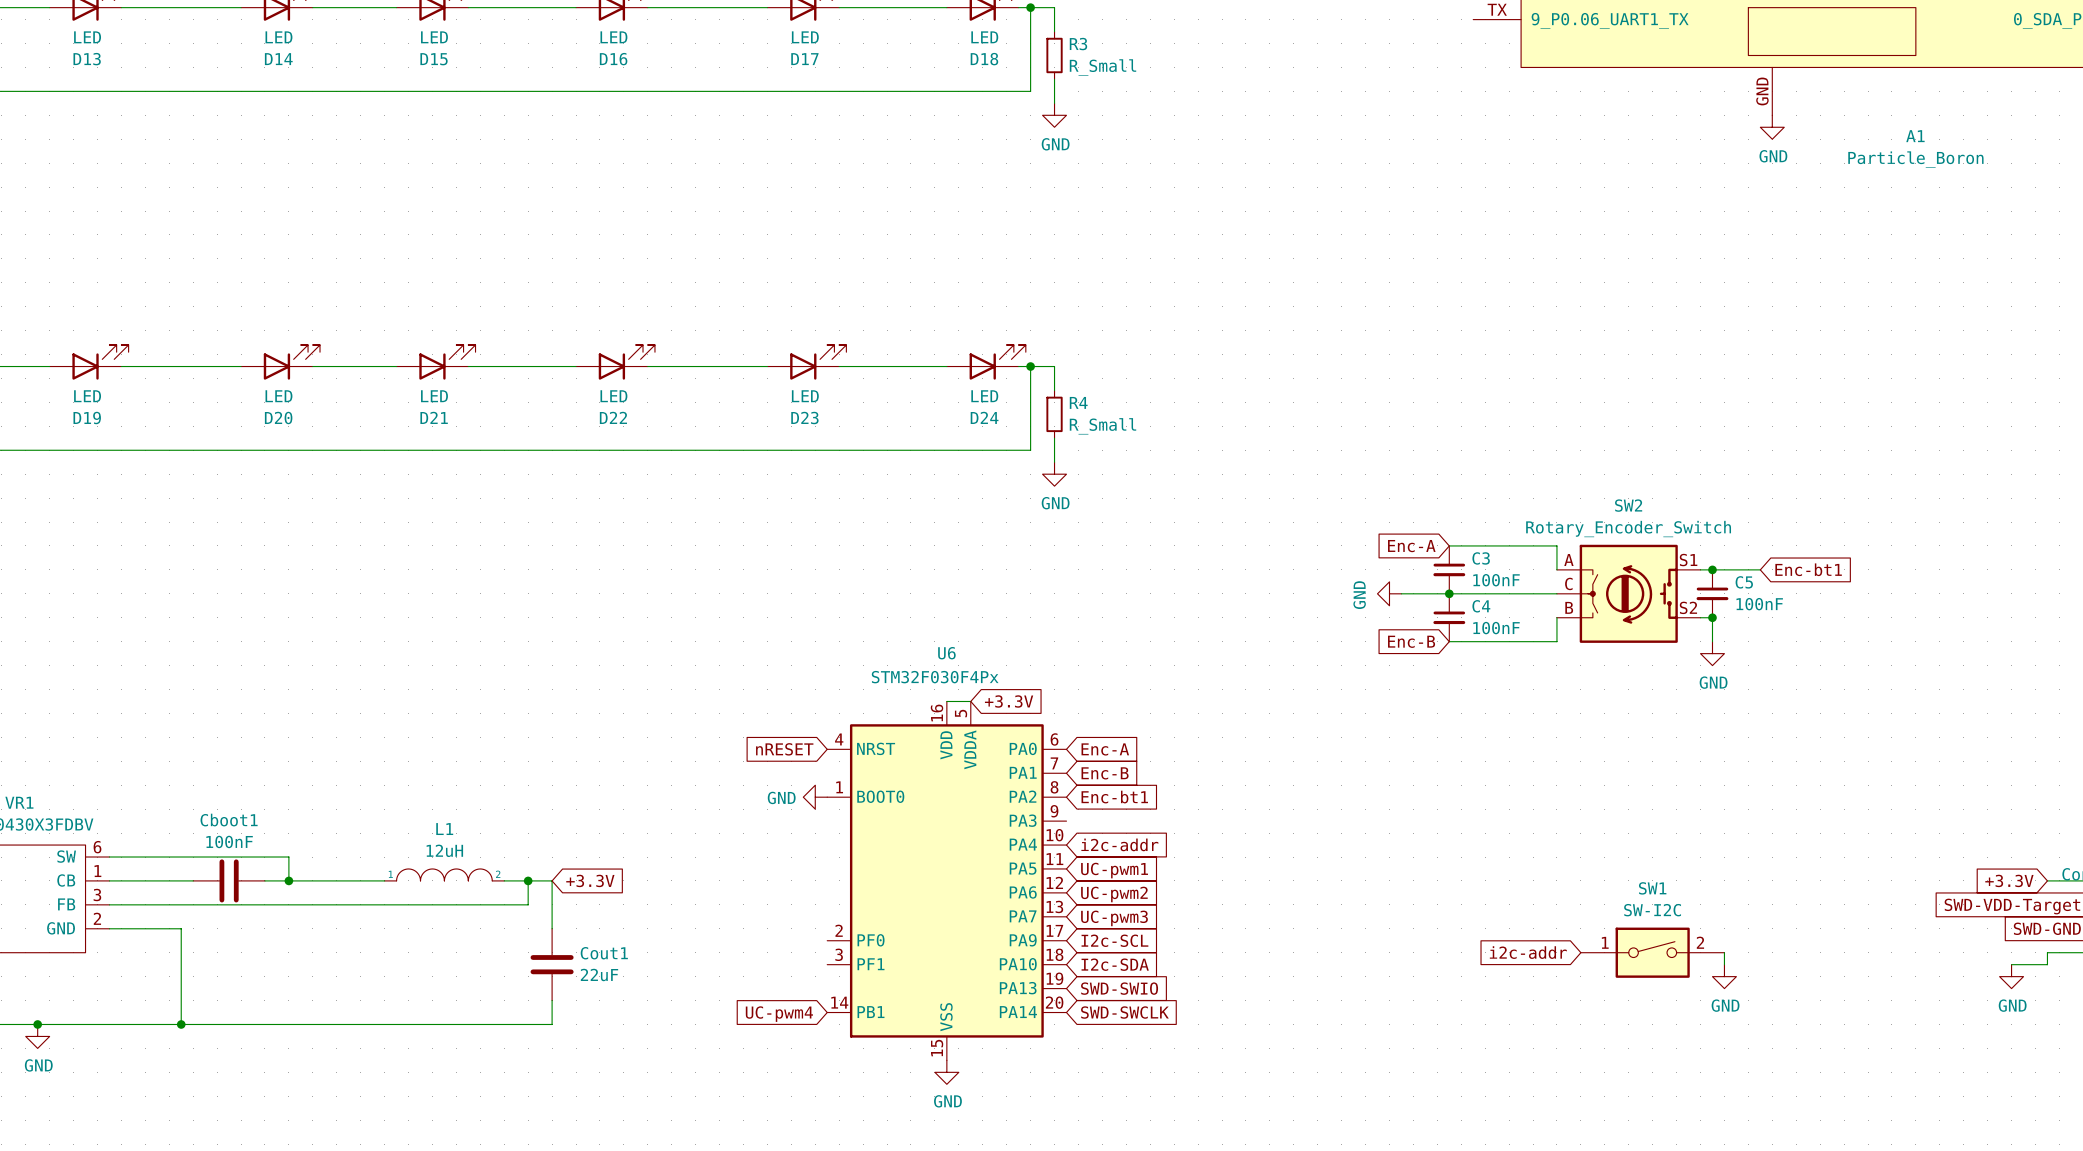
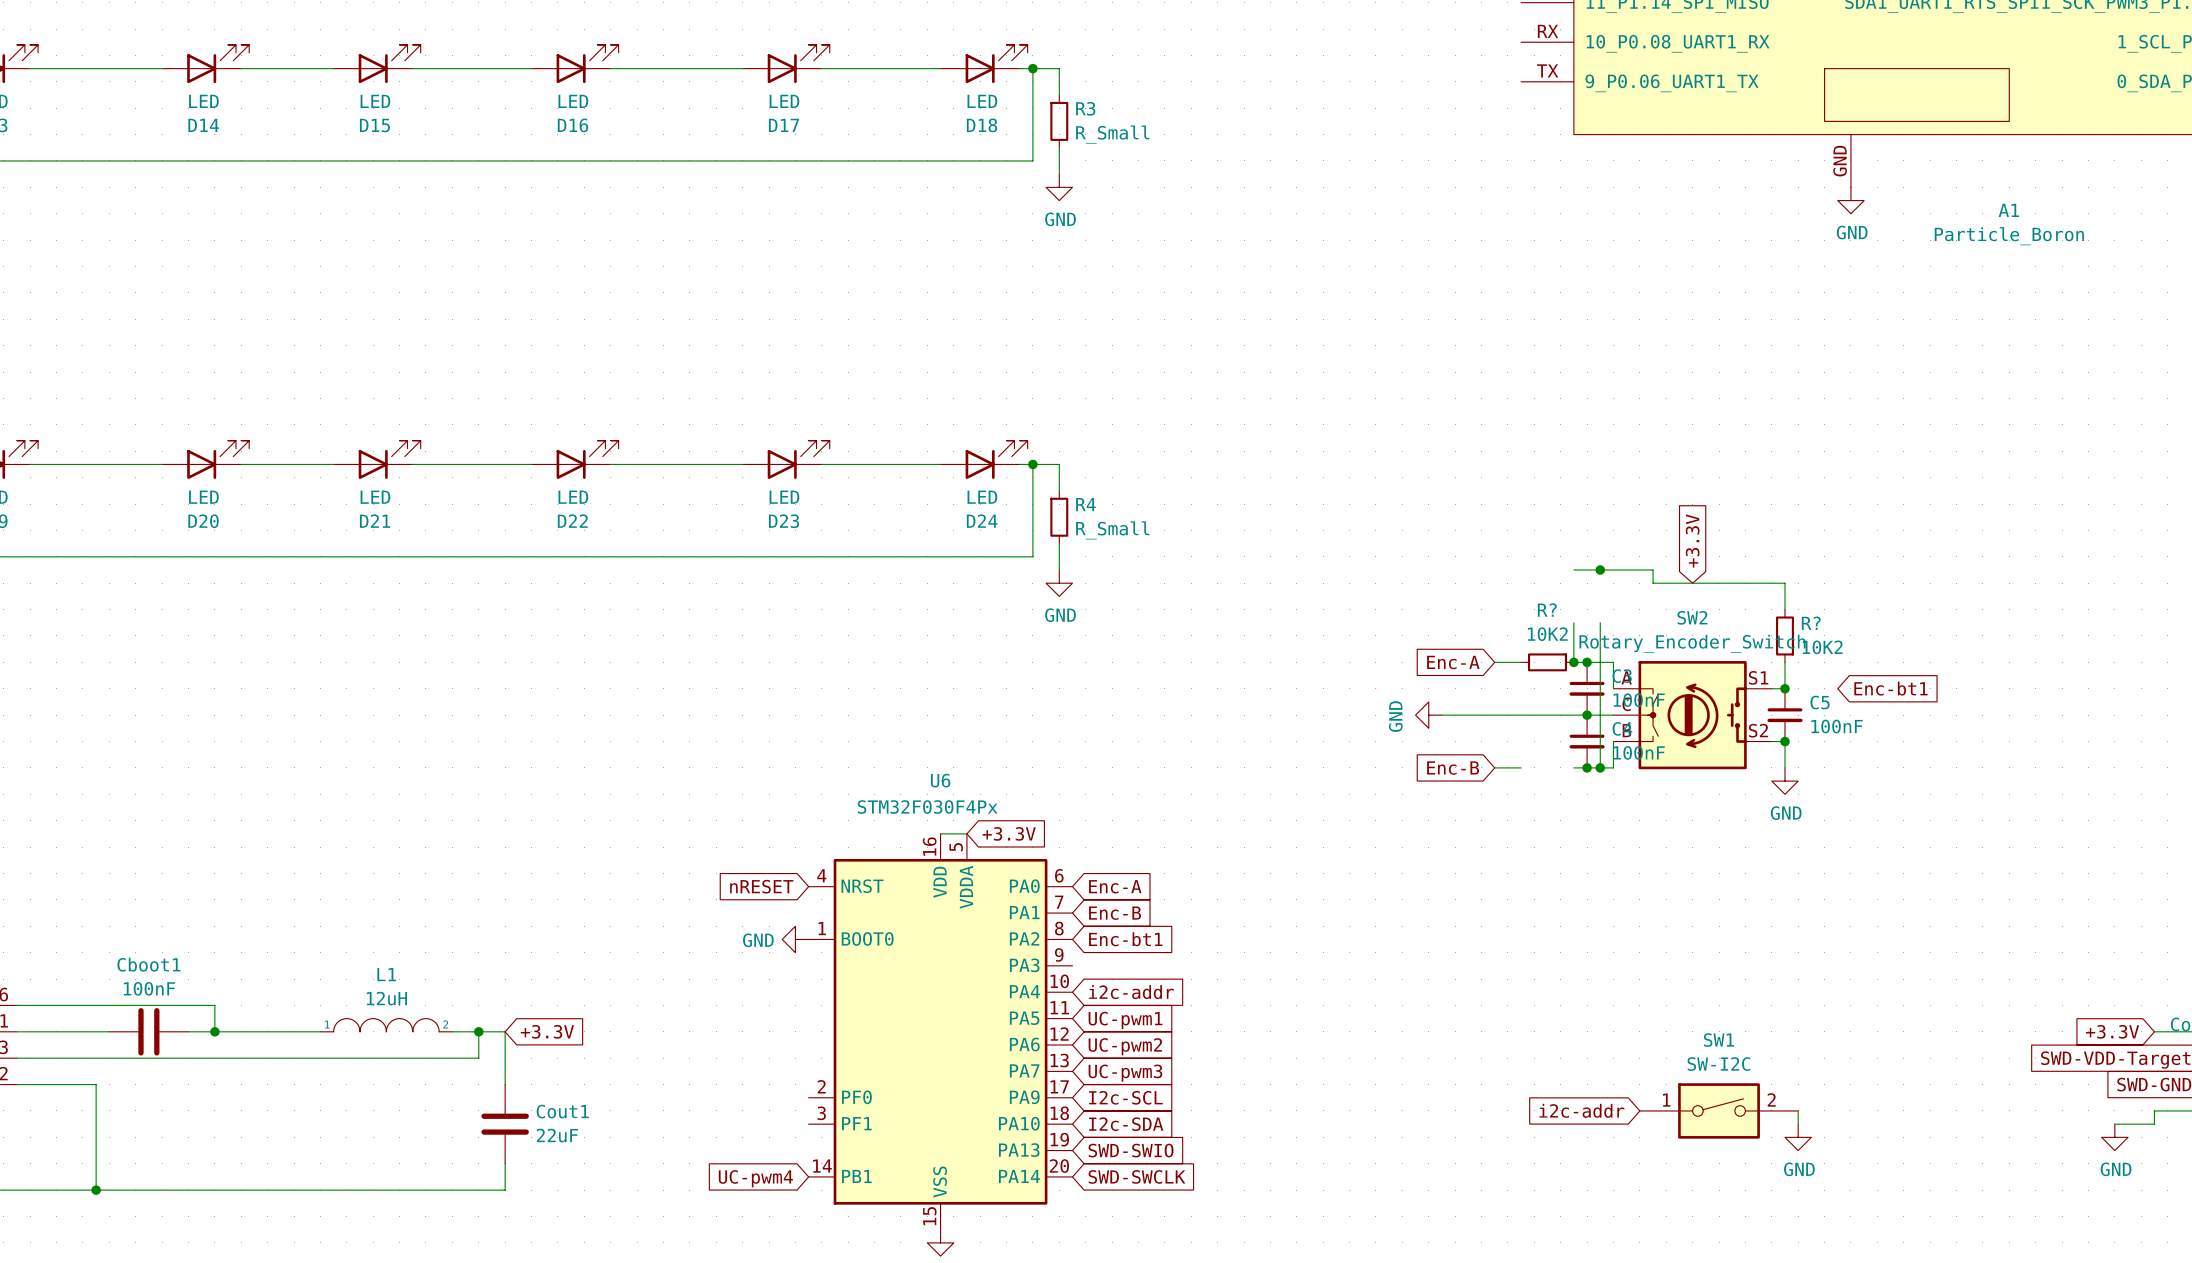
global label: none -> +3.3V (1692, 540)
wire: none -> (1573, 570) (1653, 570) (1653, 583) (1784, 583) (1784, 609)
junction: none -> (1600, 570)
wire: none -> (1600, 622) (1600, 767)
R?: none -> 10K2 (1784, 635)
wire: (1473, 545) (1521, 545) -> (1573, 622) (1573, 662)
R?: none -> 10K2 (1547, 662)
junction: none -> (1573, 662)
junction: none -> (1587, 662)
C3 position: (1449, 569) -> (1587, 688)
wire: (1712, 569) (1760, 569) -> (1784, 688) (1784, 662)
junction: (1449, 593) -> none
junction: none -> (1587, 715)
C4 position: (1449, 617) -> (1587, 741)
wire: (1473, 641) (1521, 641) -> none
junction: none -> (1587, 767)
junction: none -> (1600, 767)

